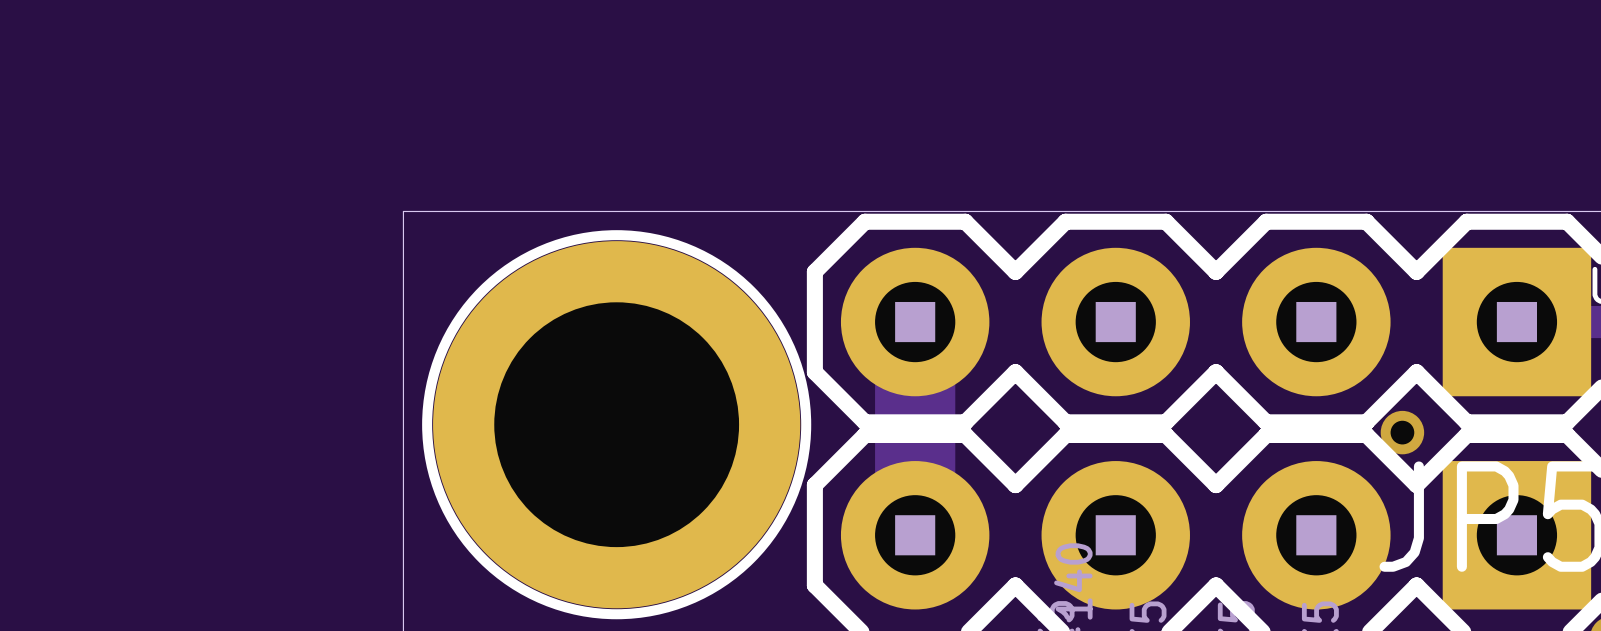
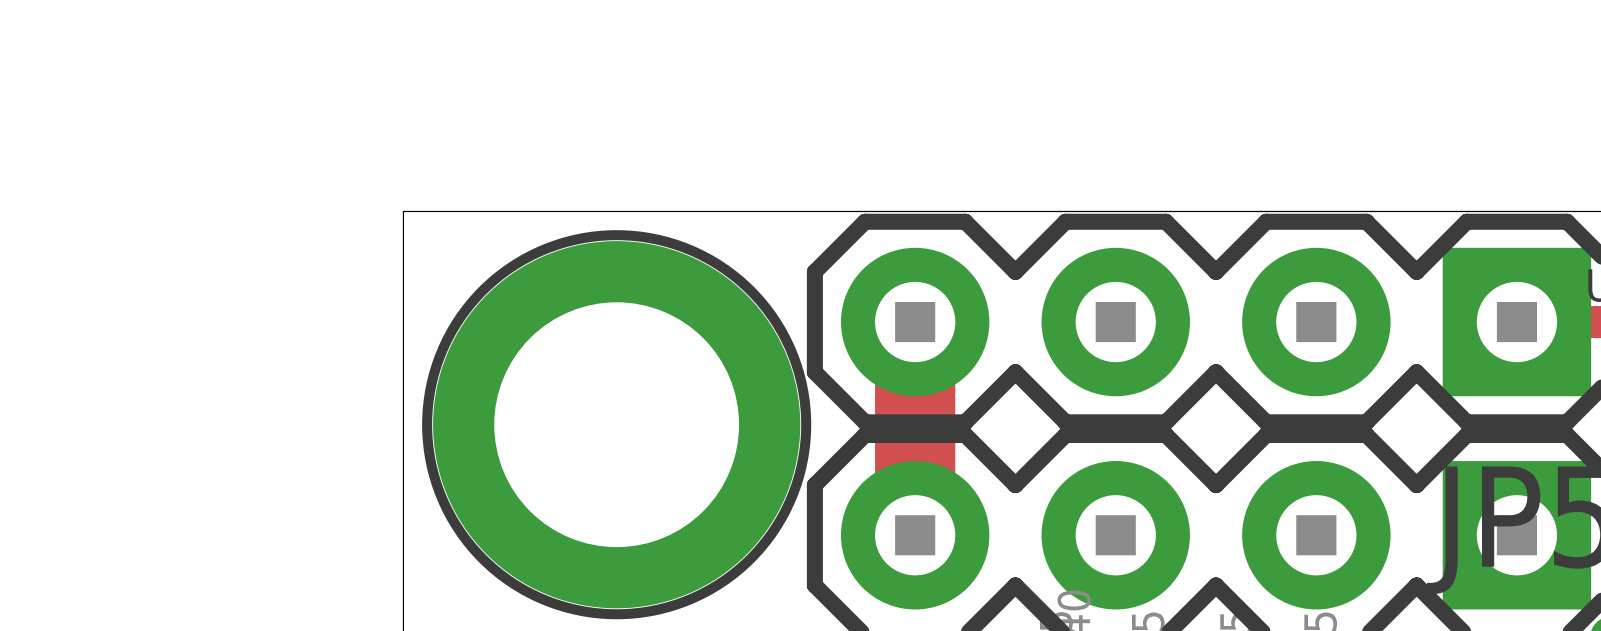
via: (1402, 432) -> none

